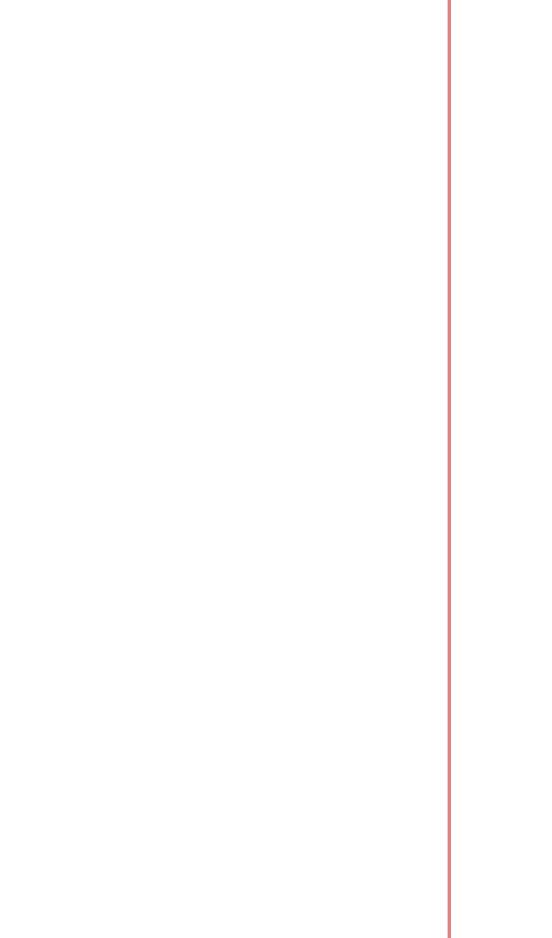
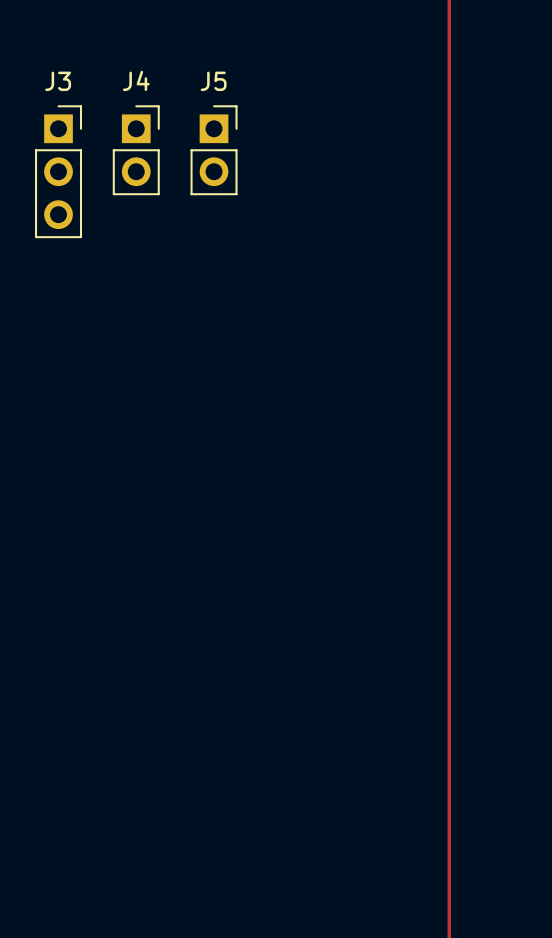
J4: none -> (136, 150)
J5: none -> (214, 150)
J3: none -> (58, 171)

